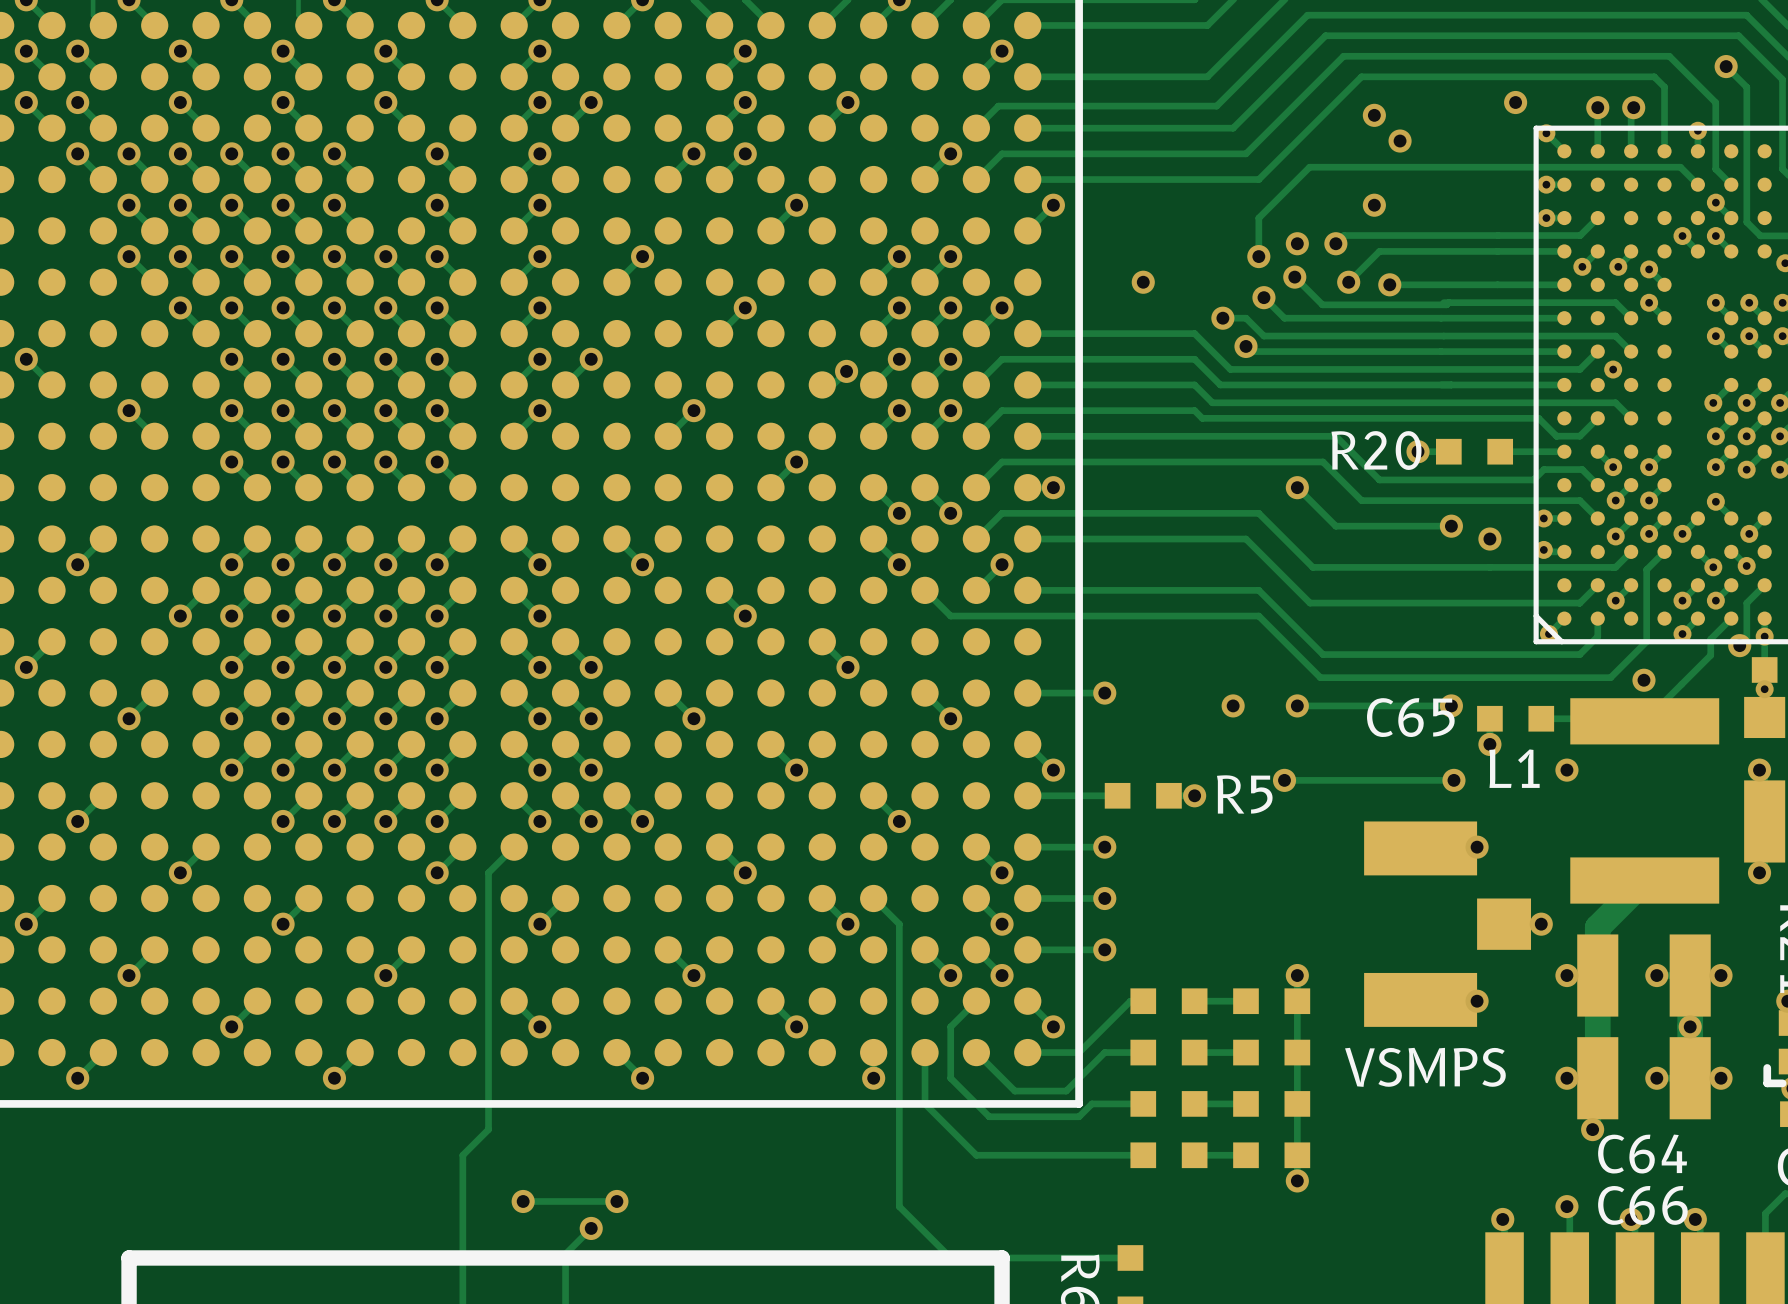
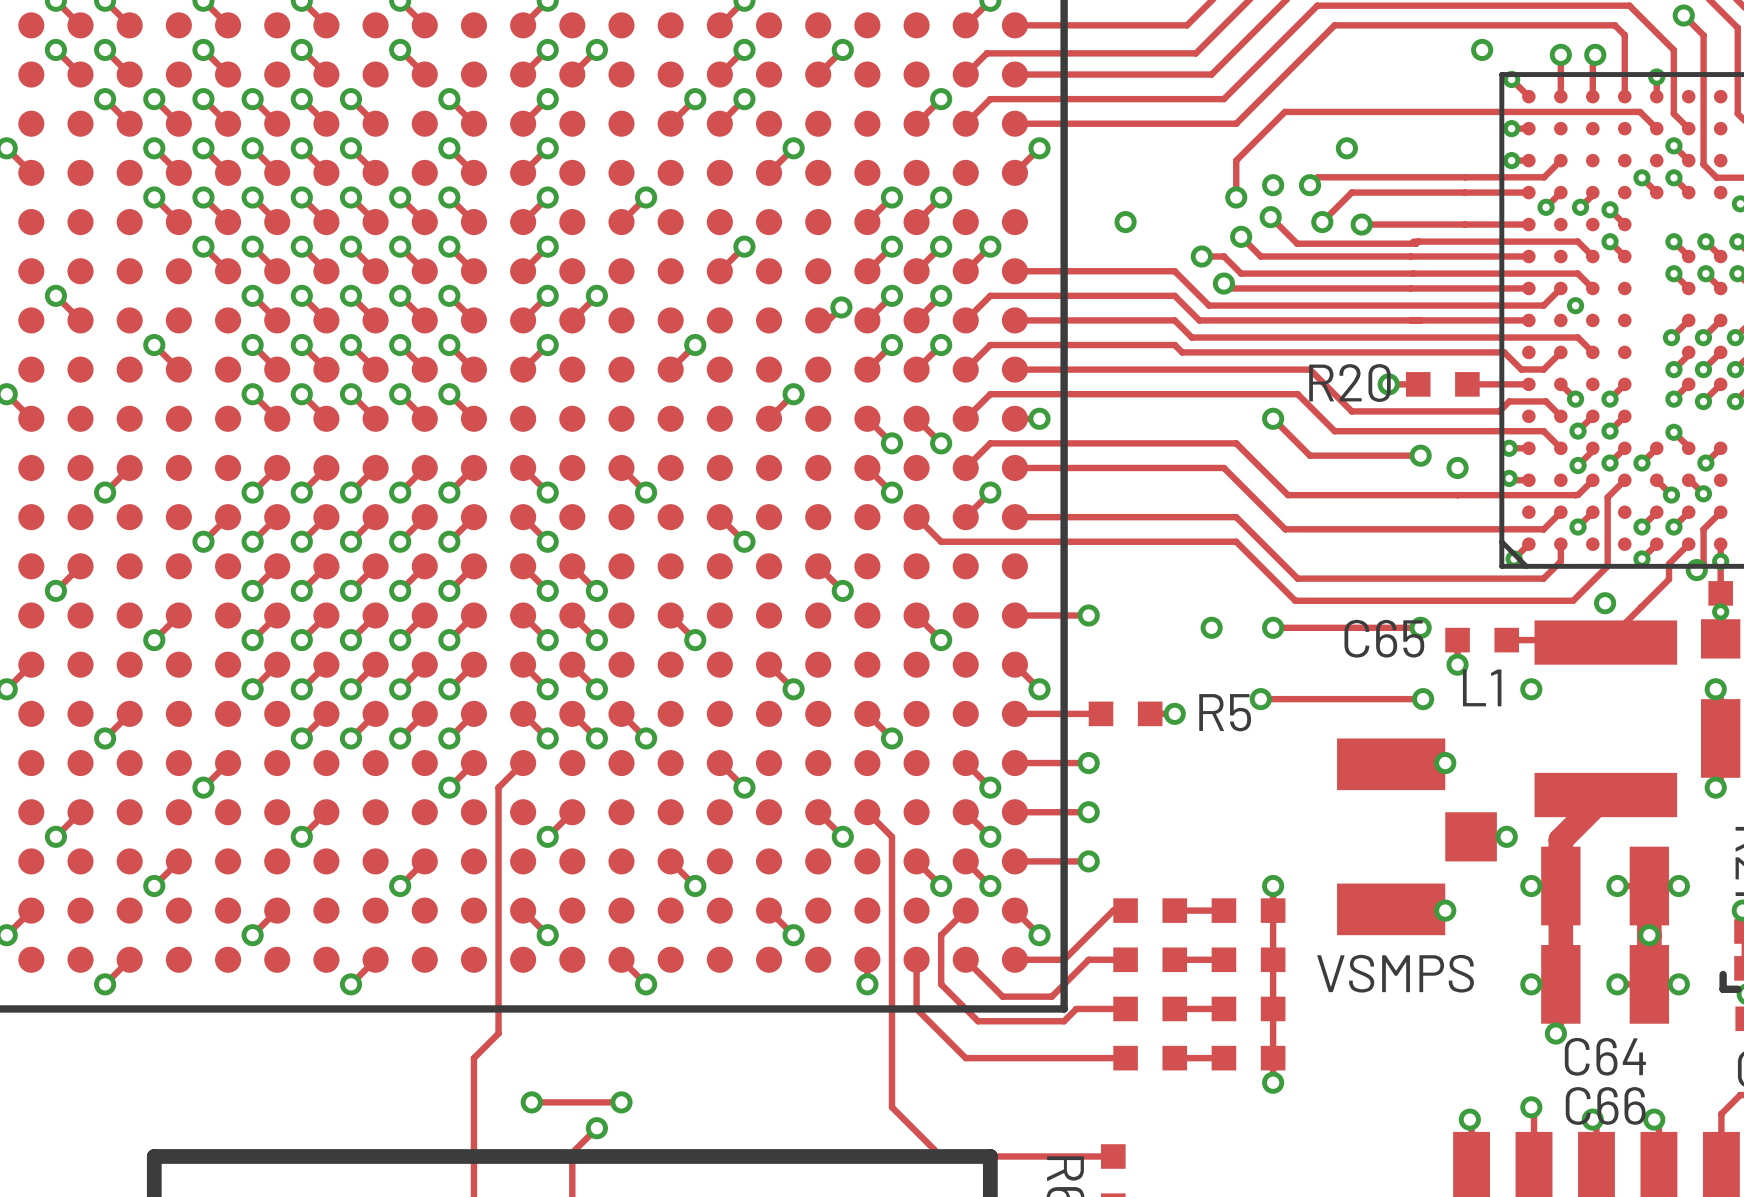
via: (1374, 115) -> none
via: (1400, 141) -> none

